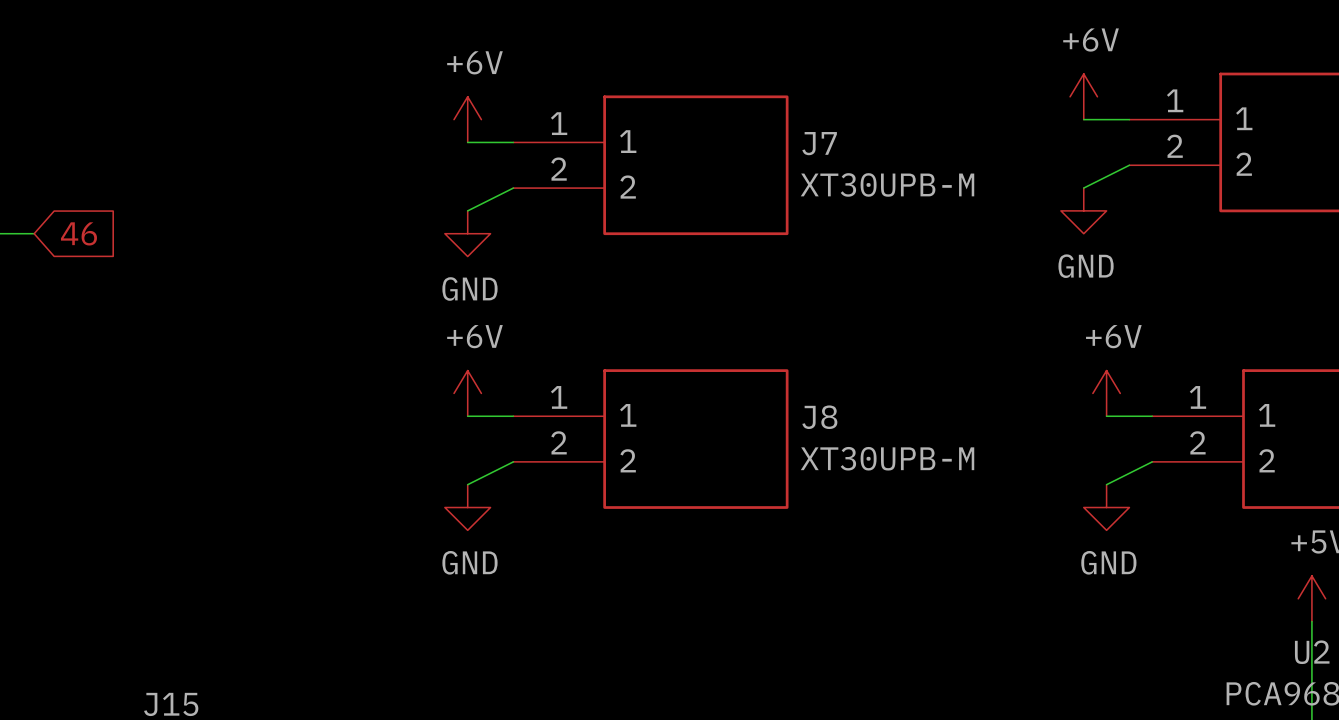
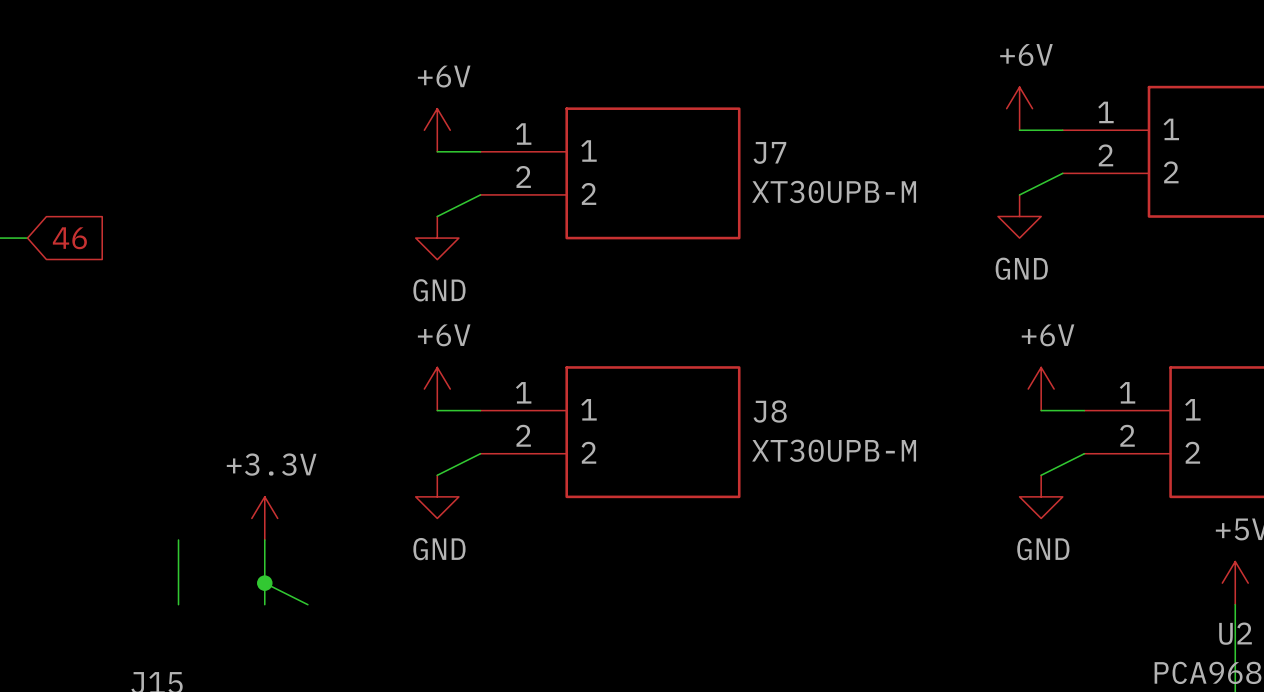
power symbol: none -> +3.3V (264, 518)
wire: none -> (178, 540) (178, 604)
wire: none -> (264, 540) (264, 604)
wire: none -> (264, 583) (307, 604)
junction: none -> (264, 583)

